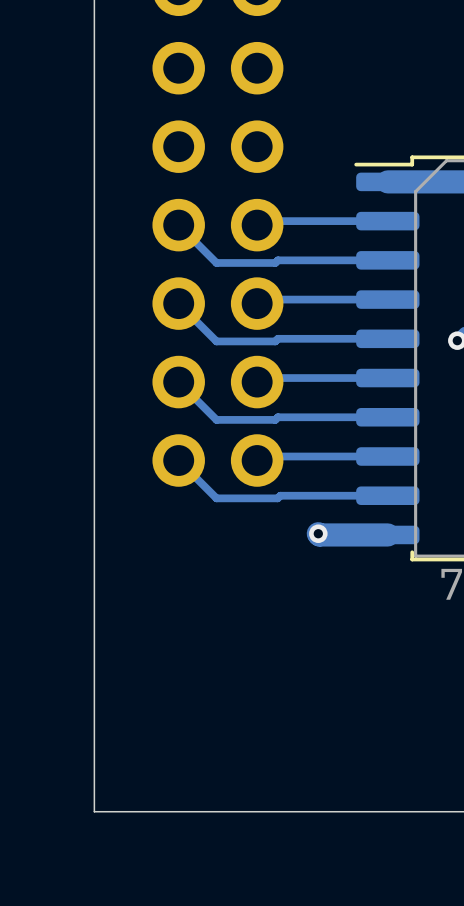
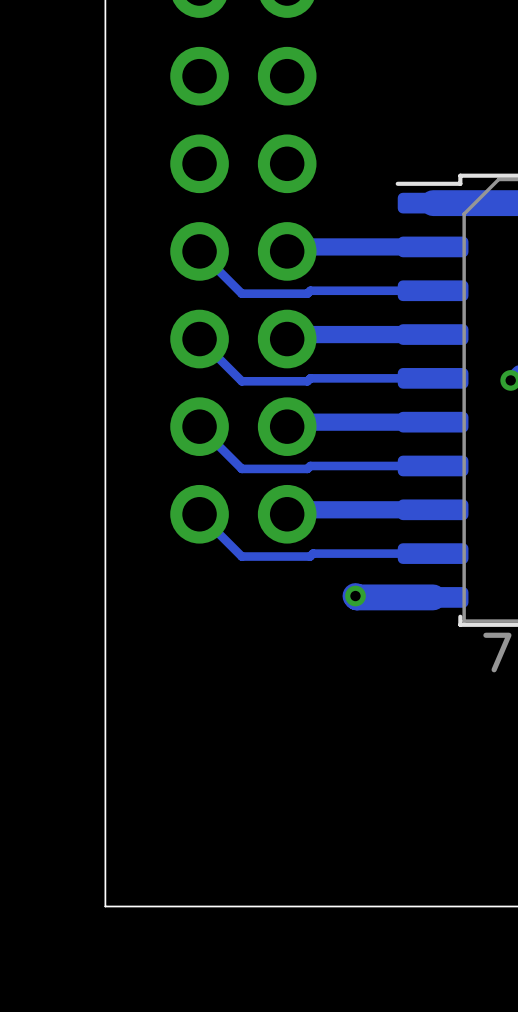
track width: thin (387, 221) (261, 221) (257, 225) -> thick (433, 246) (291, 246) (287, 251)
track width: thin (387, 299) (261, 299) (257, 303) -> thick (433, 334) (291, 334) (287, 339)
track width: thin (387, 378) (261, 378) (257, 382) -> thick (433, 422) (291, 422) (287, 426)
track width: thin (387, 456) (261, 456) (257, 460) -> thick (433, 509) (291, 509) (287, 514)

